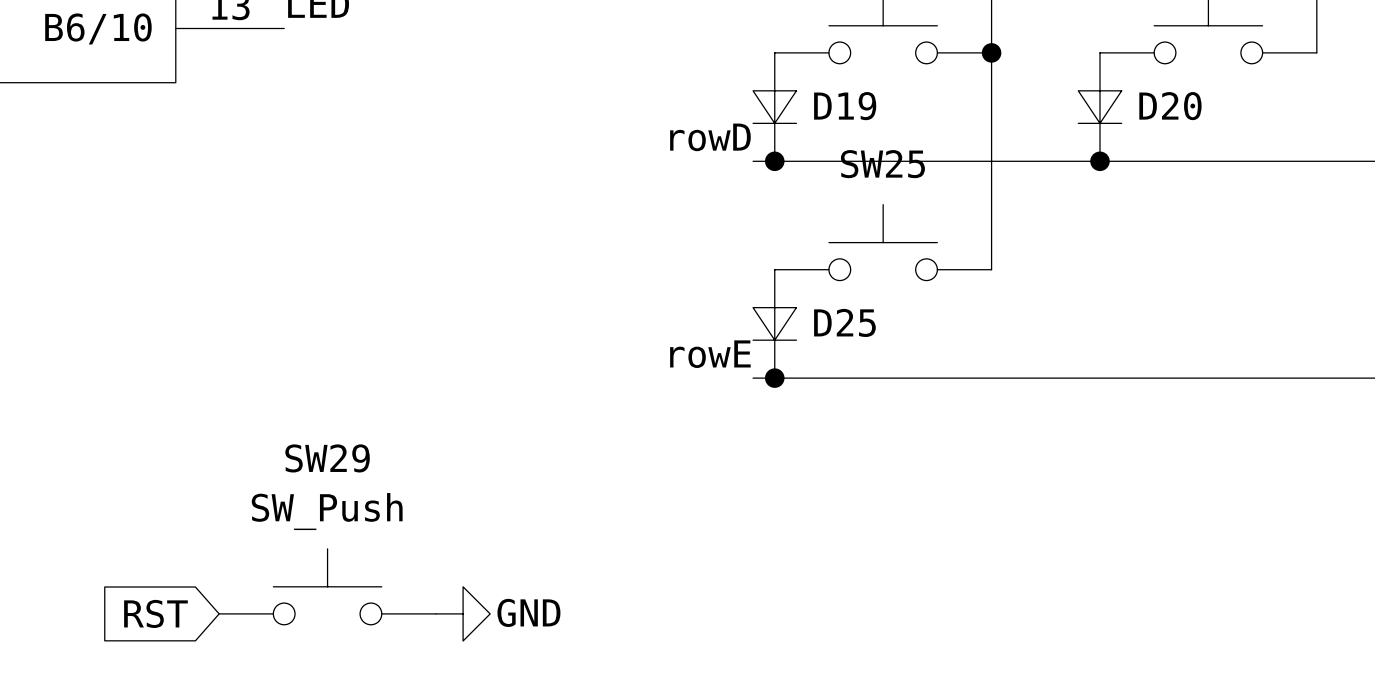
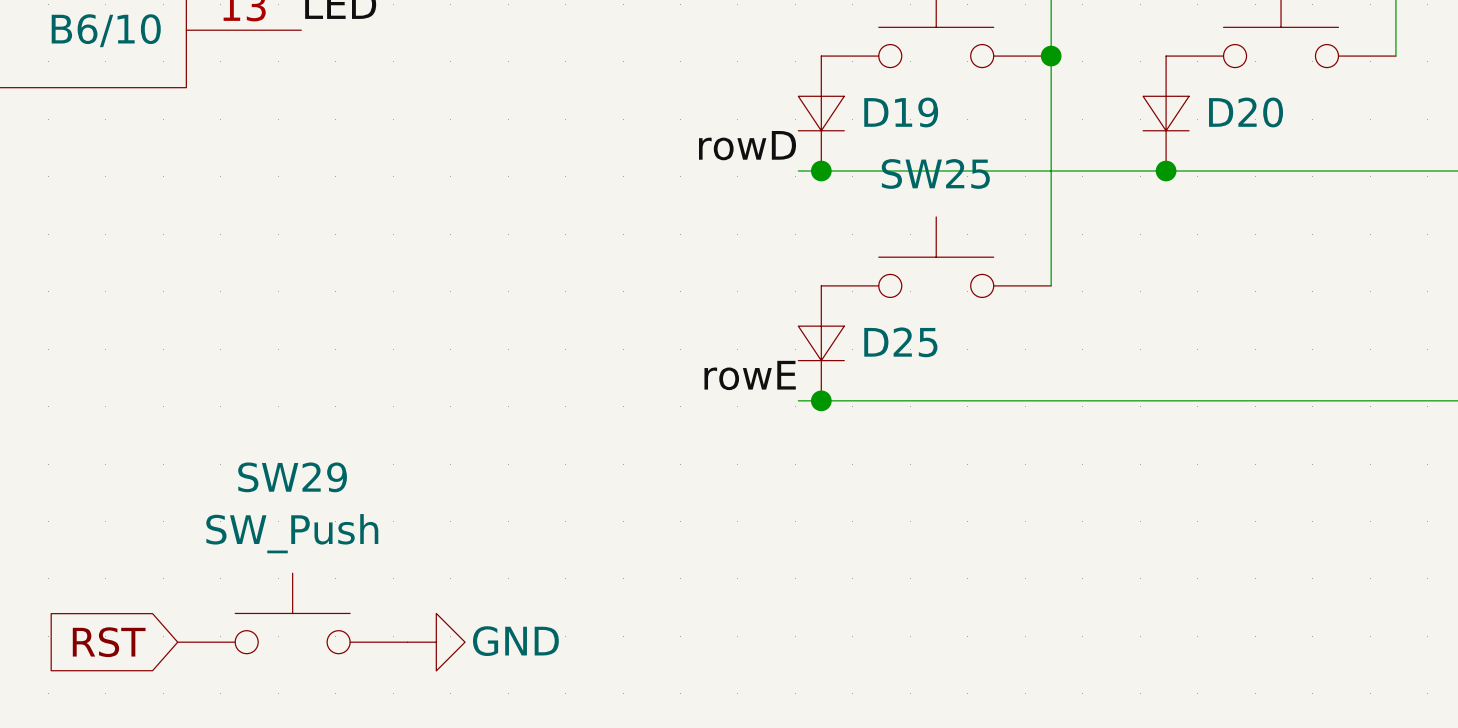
SW29 position: (327, 586) -> (292, 613)
global label position: RST (155, 613) -> RST (109, 642)
power symbol position: GND (463, 613) -> GND (436, 642)

